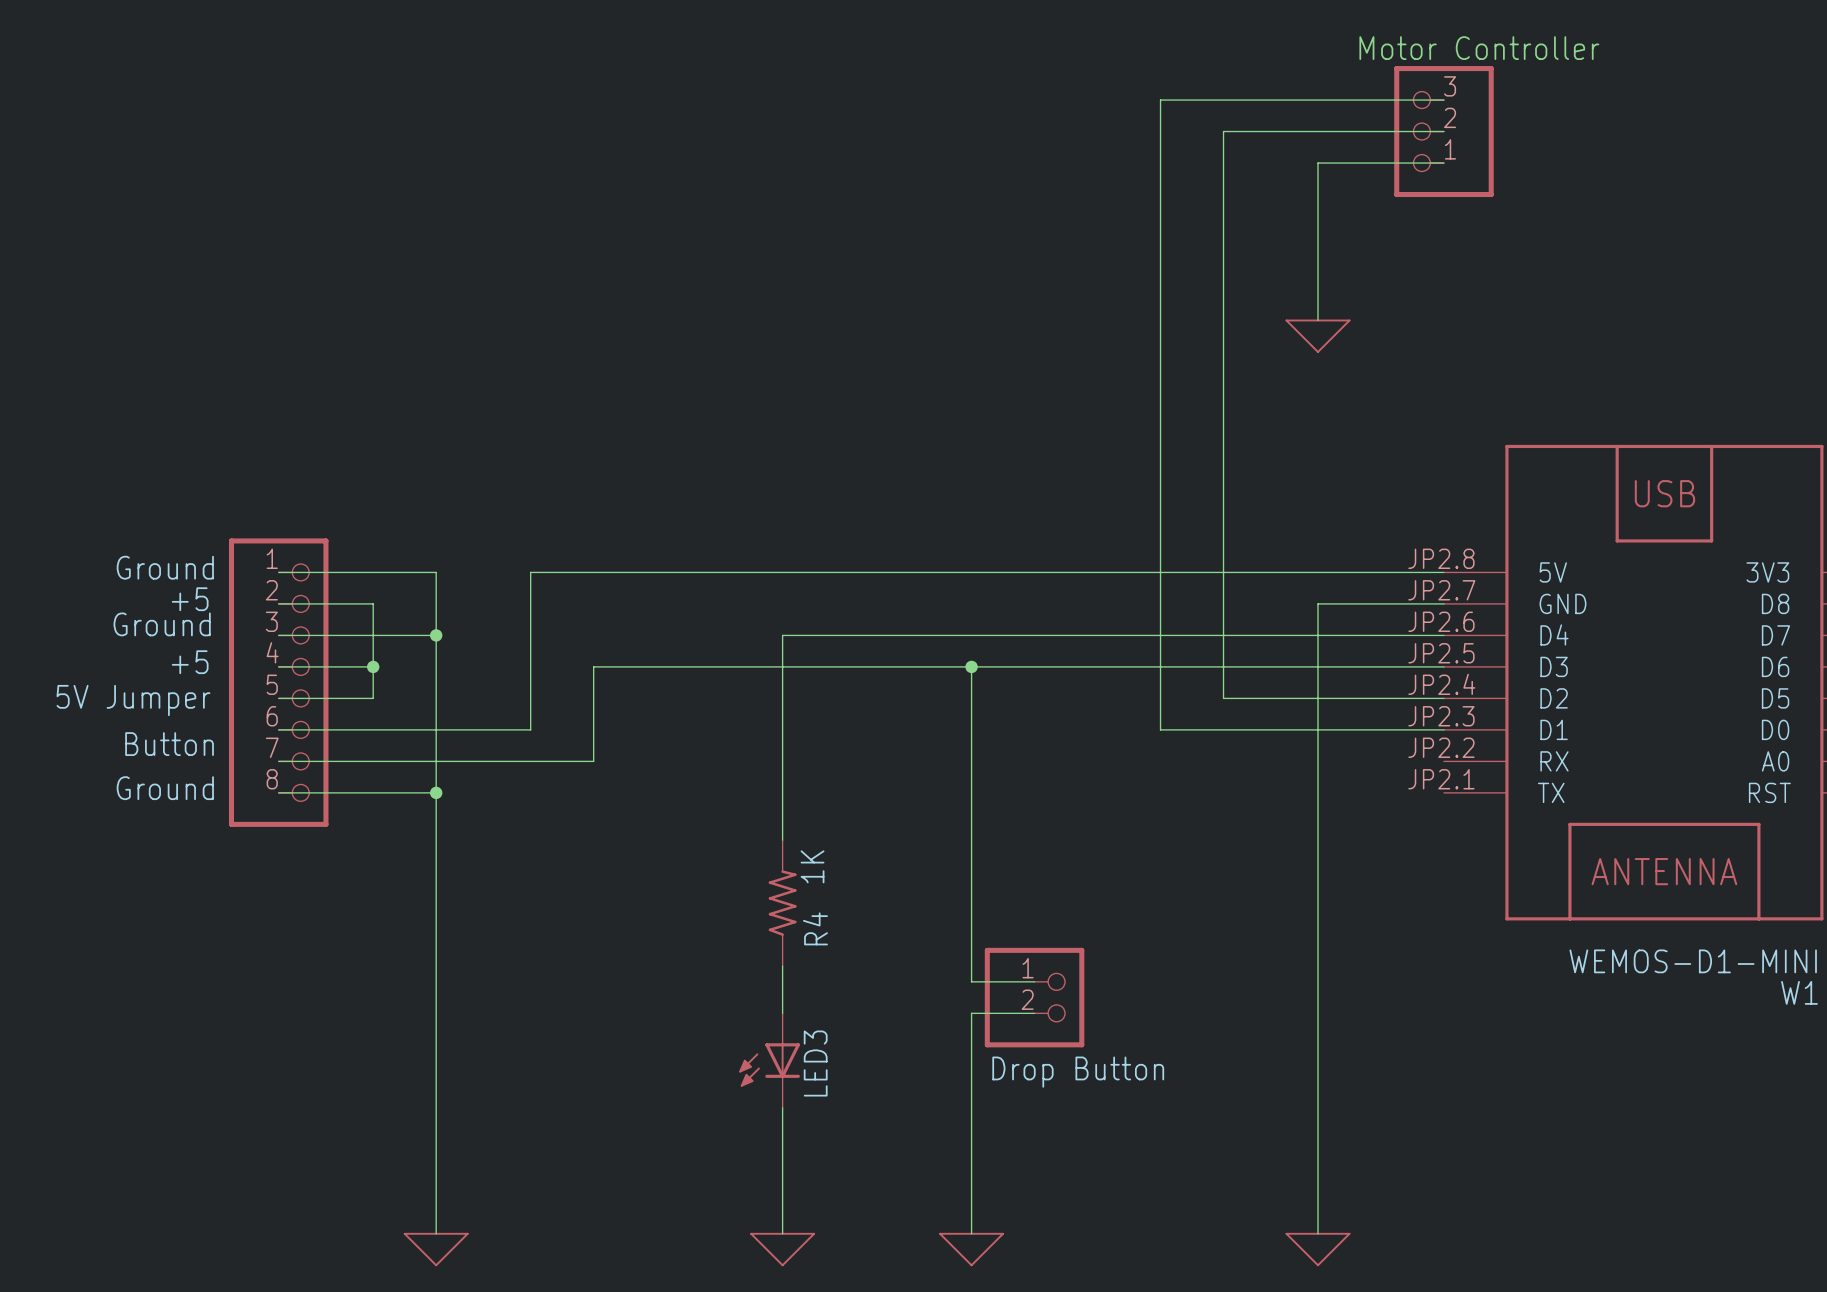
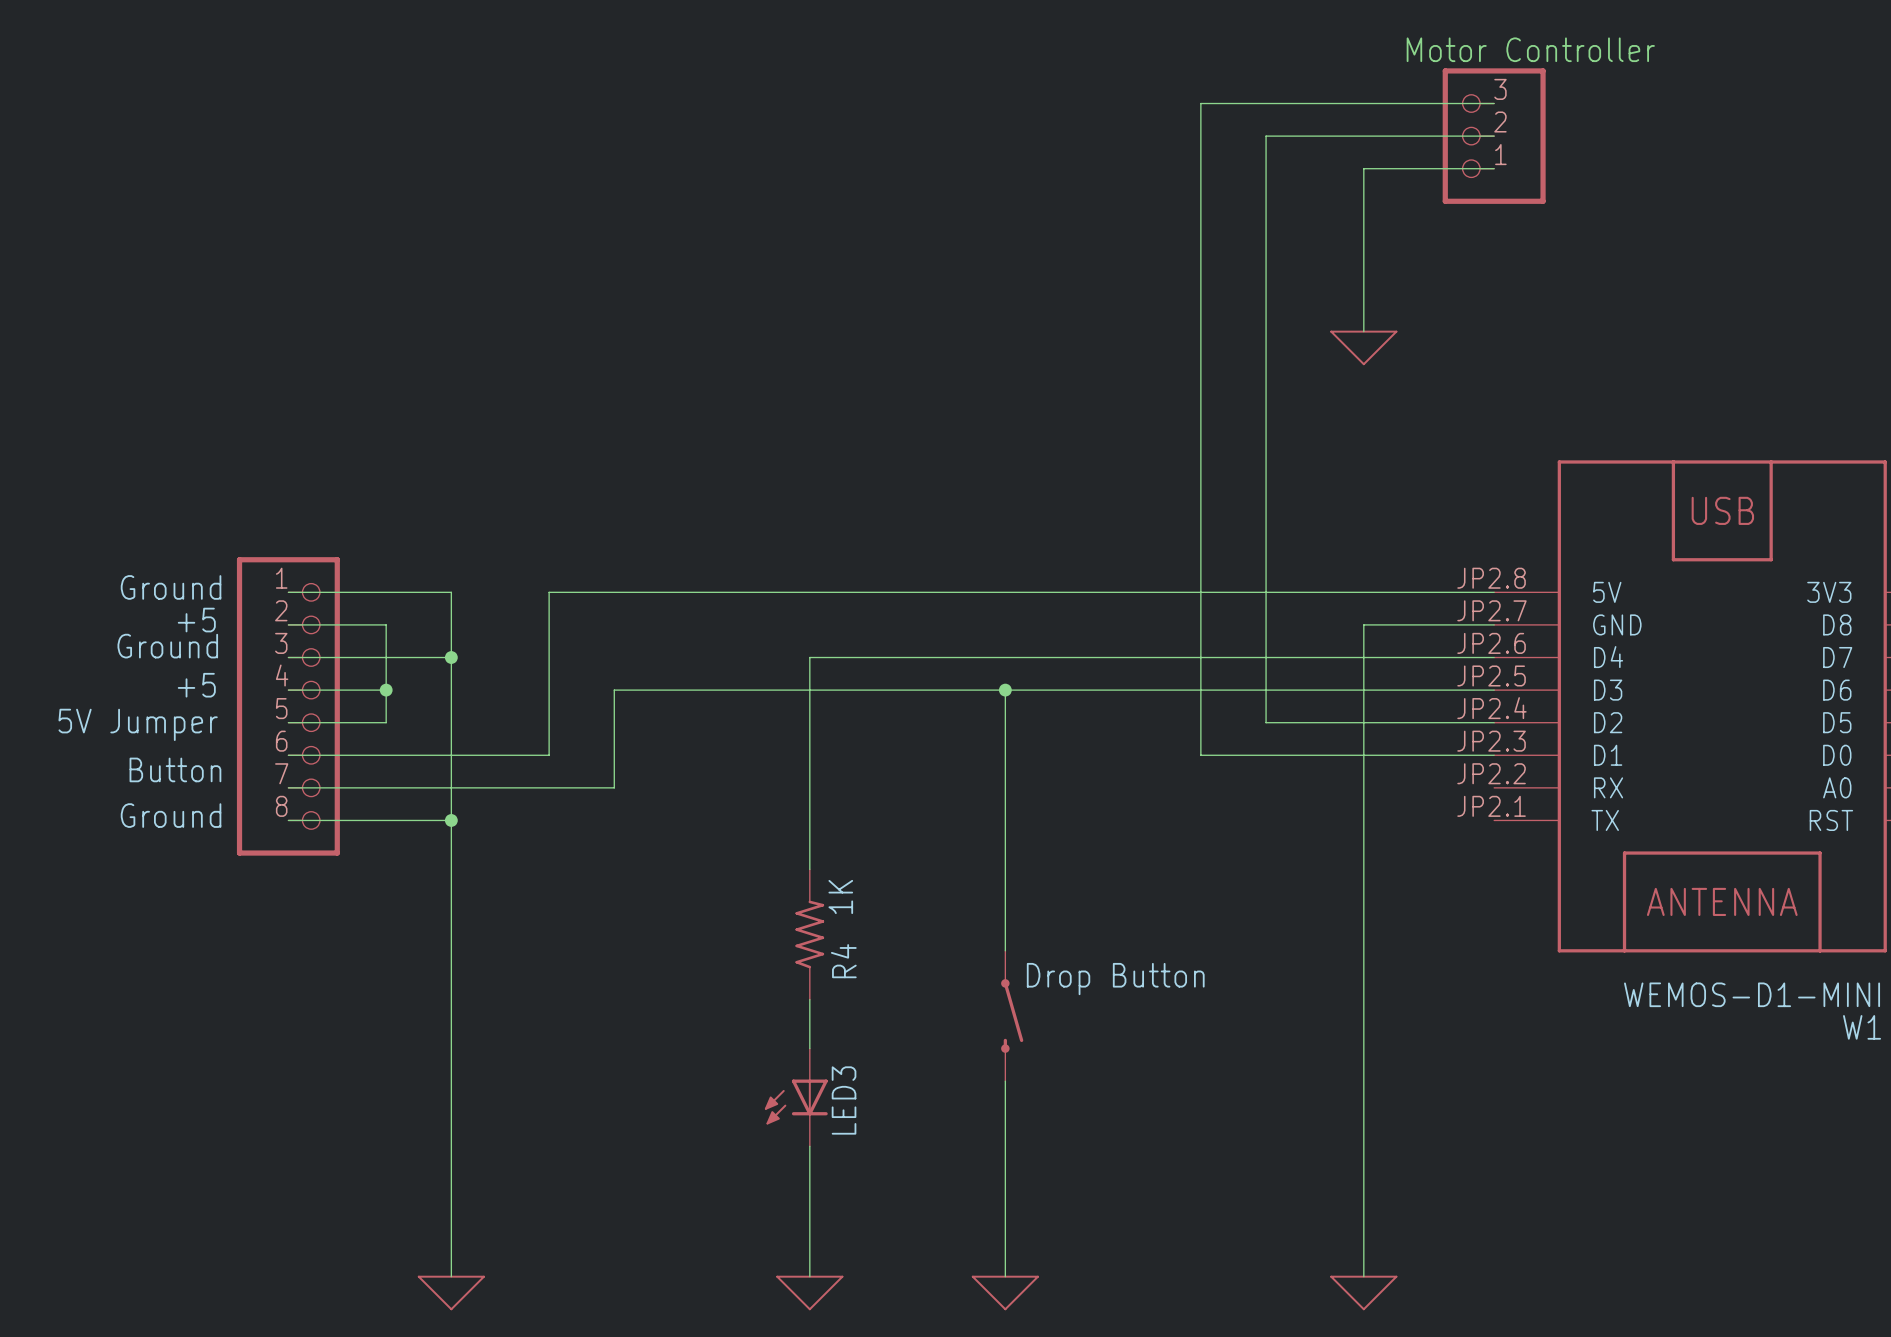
wire: (971, 918) (971, 981) (1034, 981) -> none
part: none -> (1012, 1015)
part: (1034, 997) -> none
wire: (1034, 1013) (971, 1013) (971, 1044) -> none
text position: Drop Button (1078, 1072) -> Drop Button (1115, 979)

